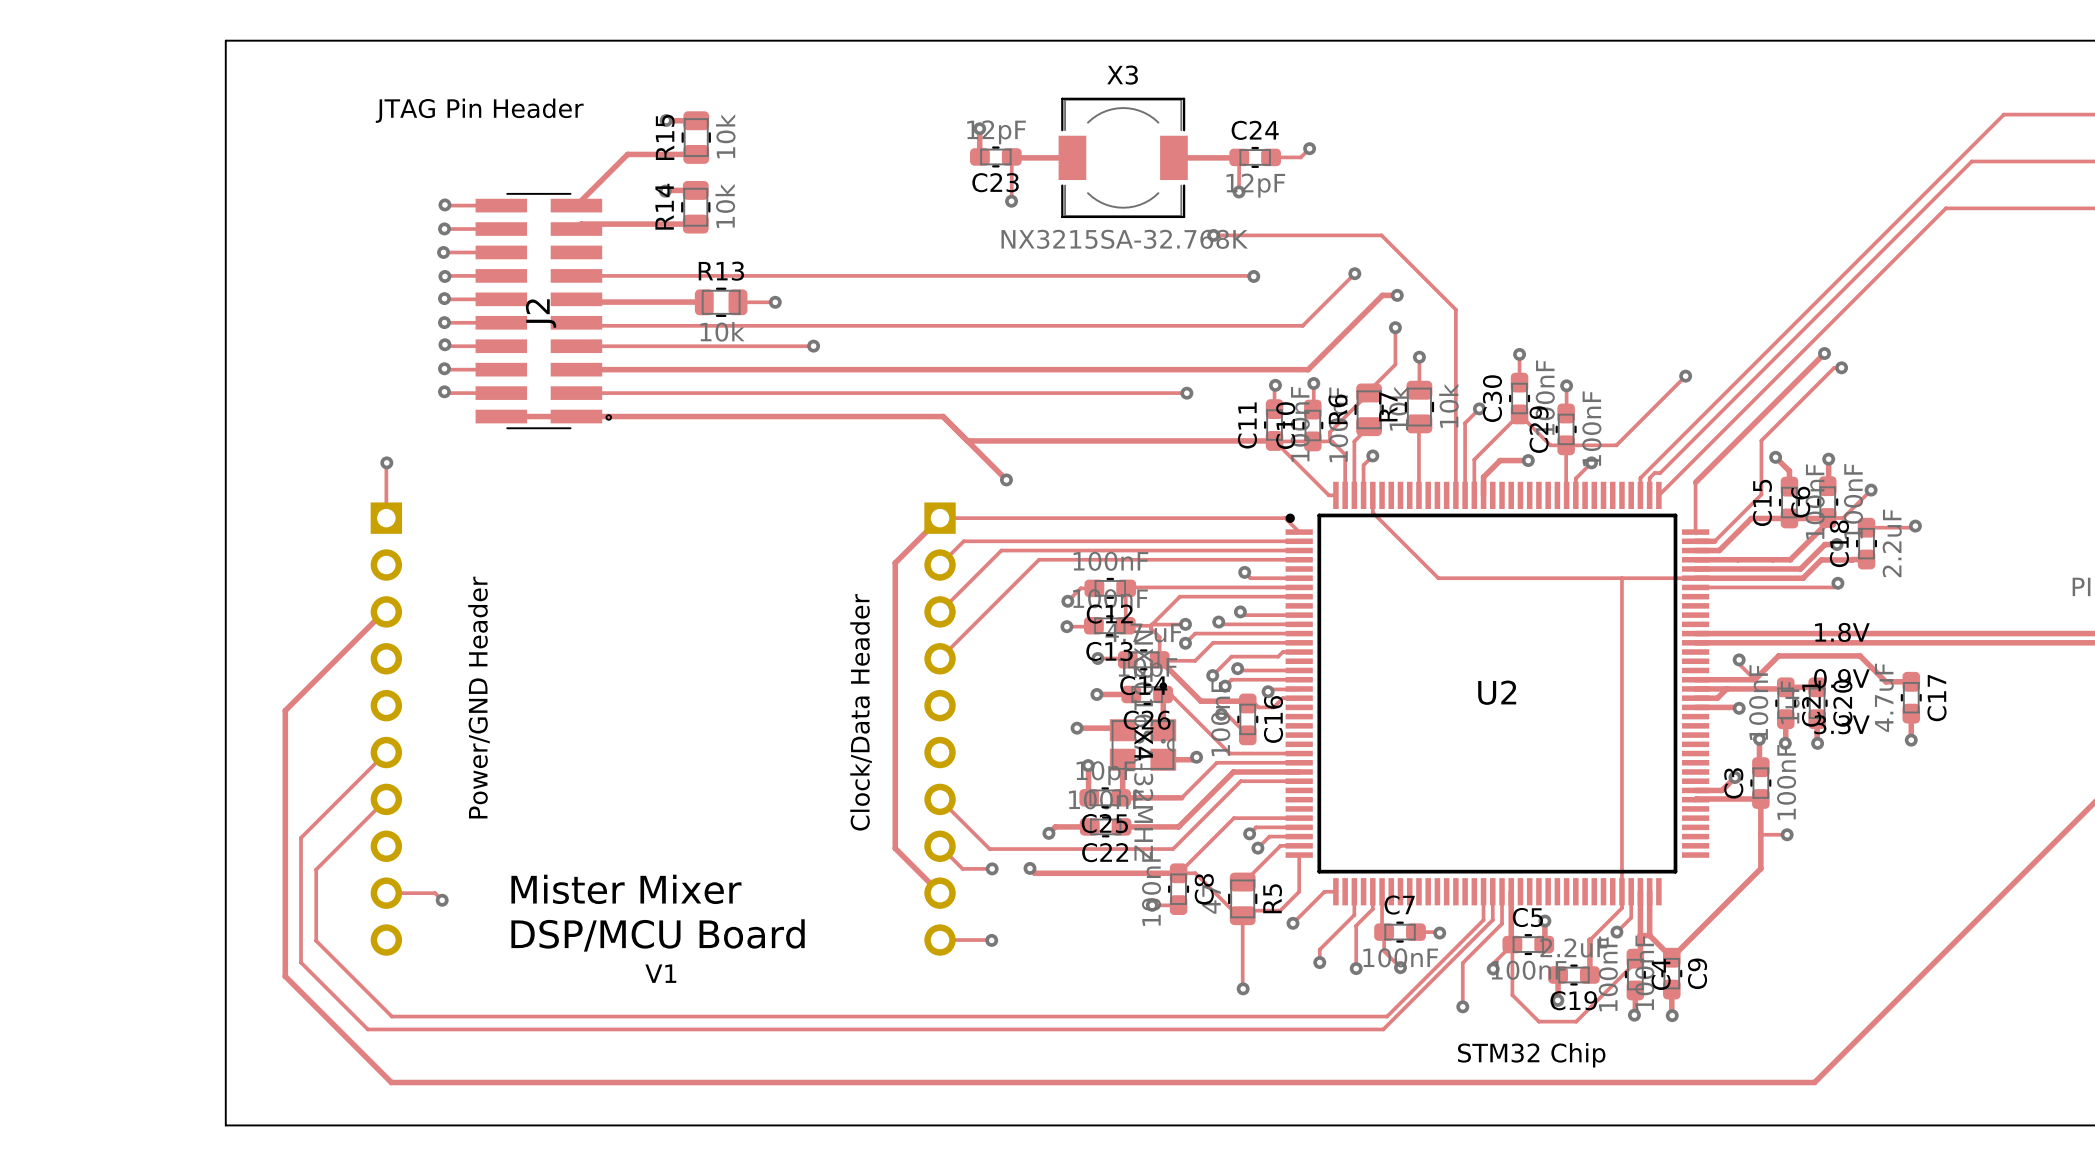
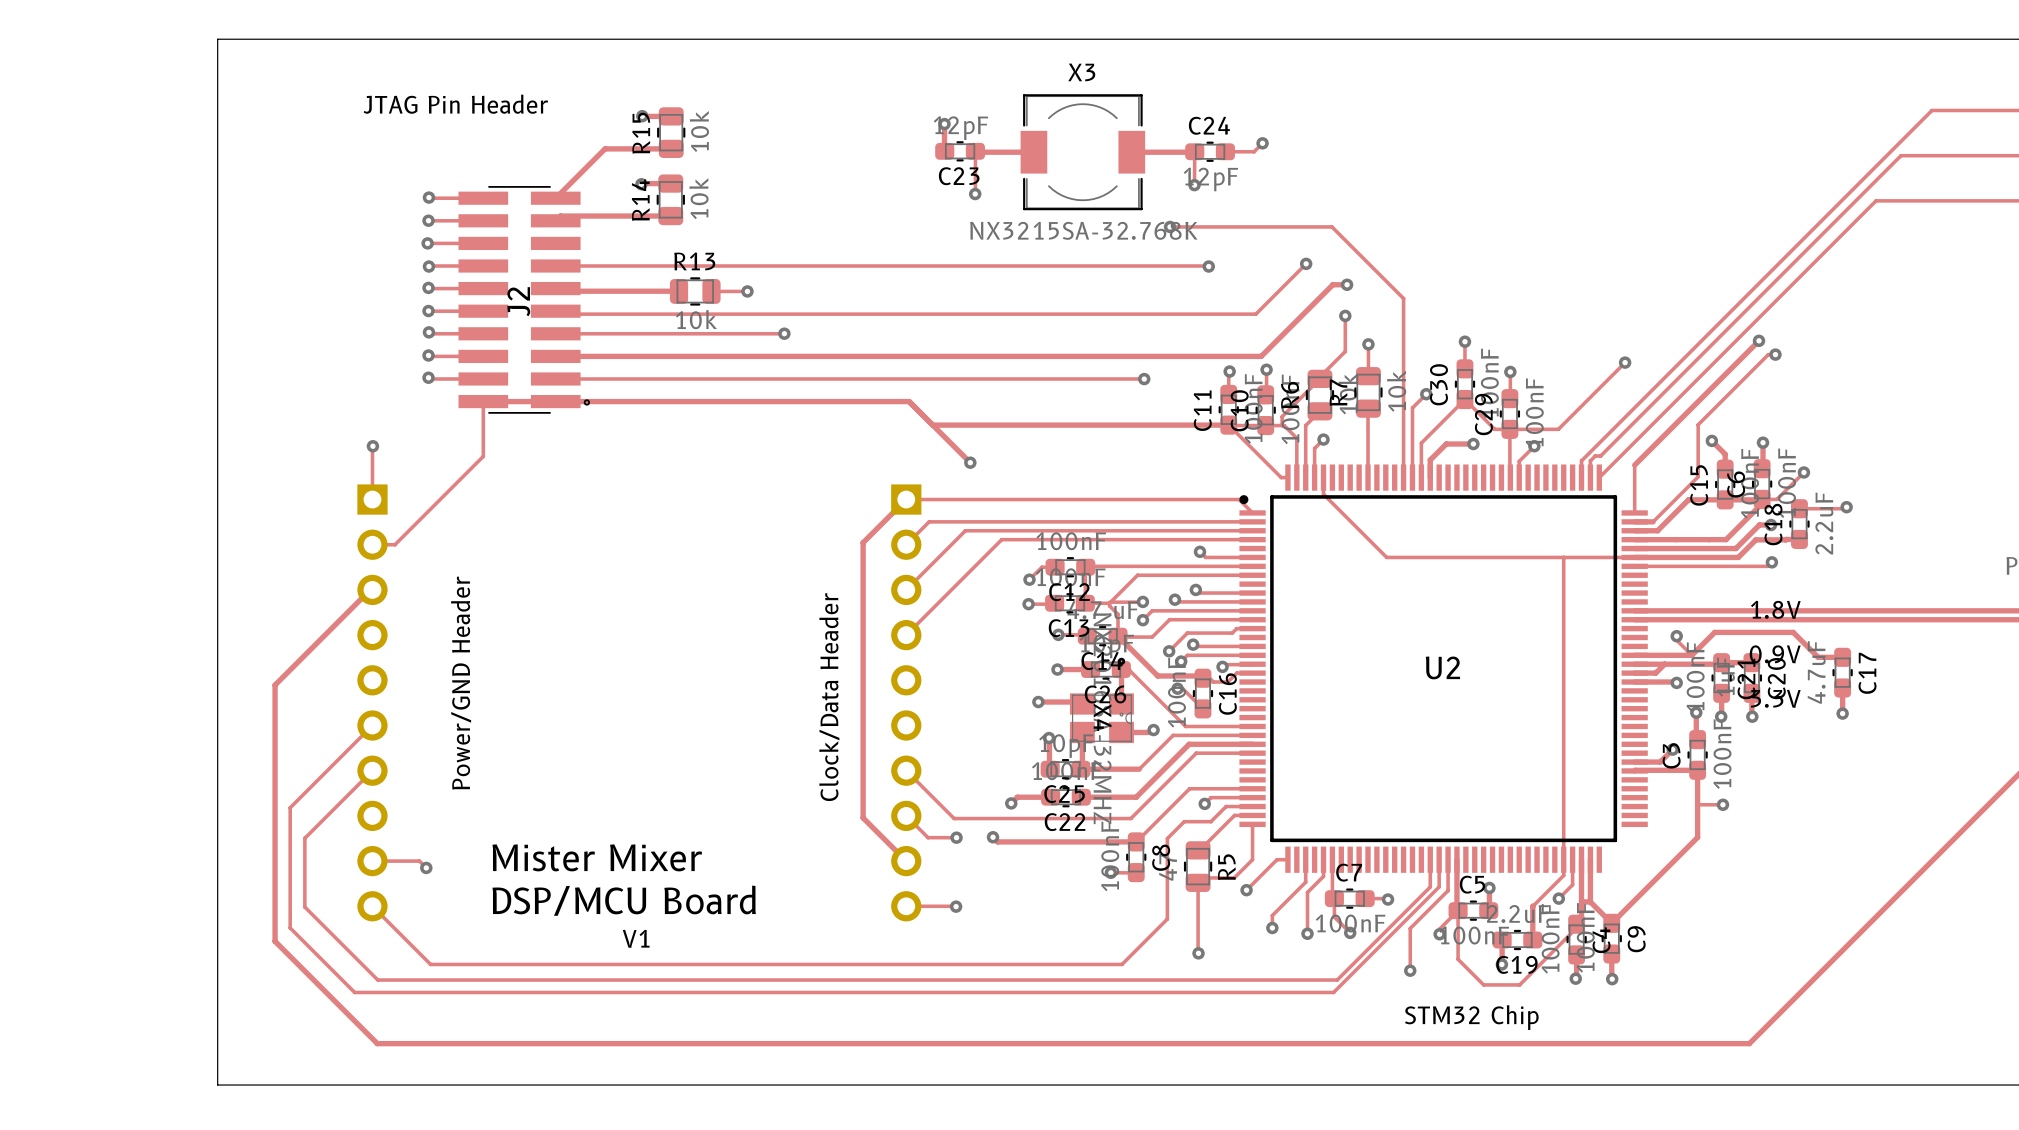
track: none -> (483, 401) (483, 456) (394, 544) (372, 544)
track: (1271, 836) (1257, 848) -> (1226, 806) (1210, 821) (1184, 821) (1167, 838) (1167, 919) (1122, 964) (430, 964) (372, 906)
via: (1257, 848) -> none
track: (1178, 873) (1195, 873) (1237, 915) (1242, 915) -> none

